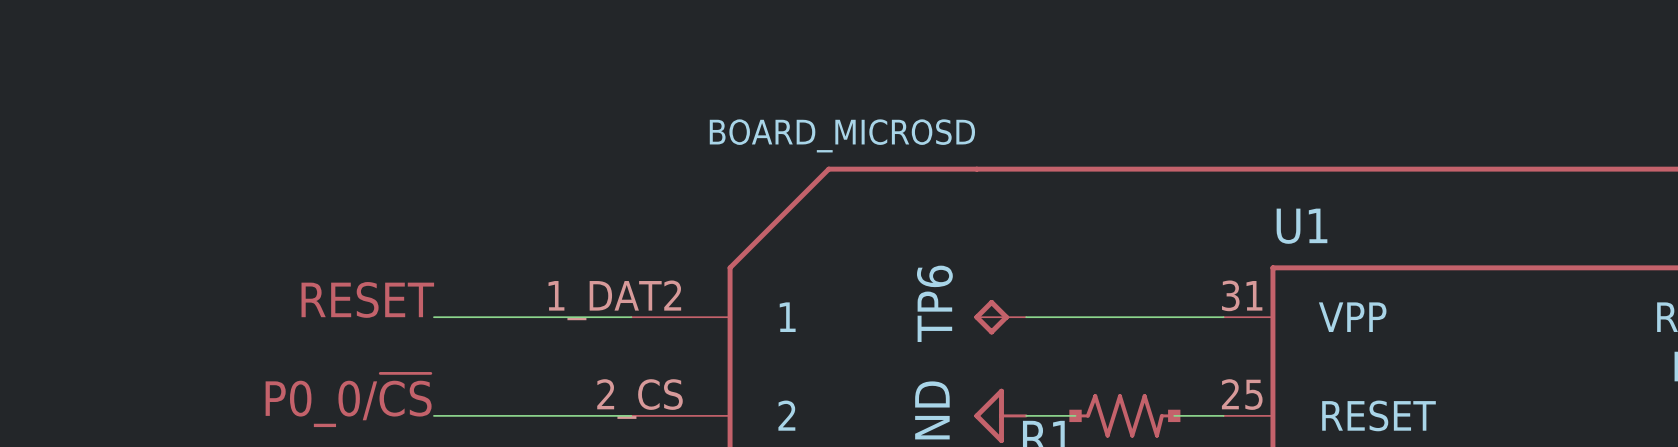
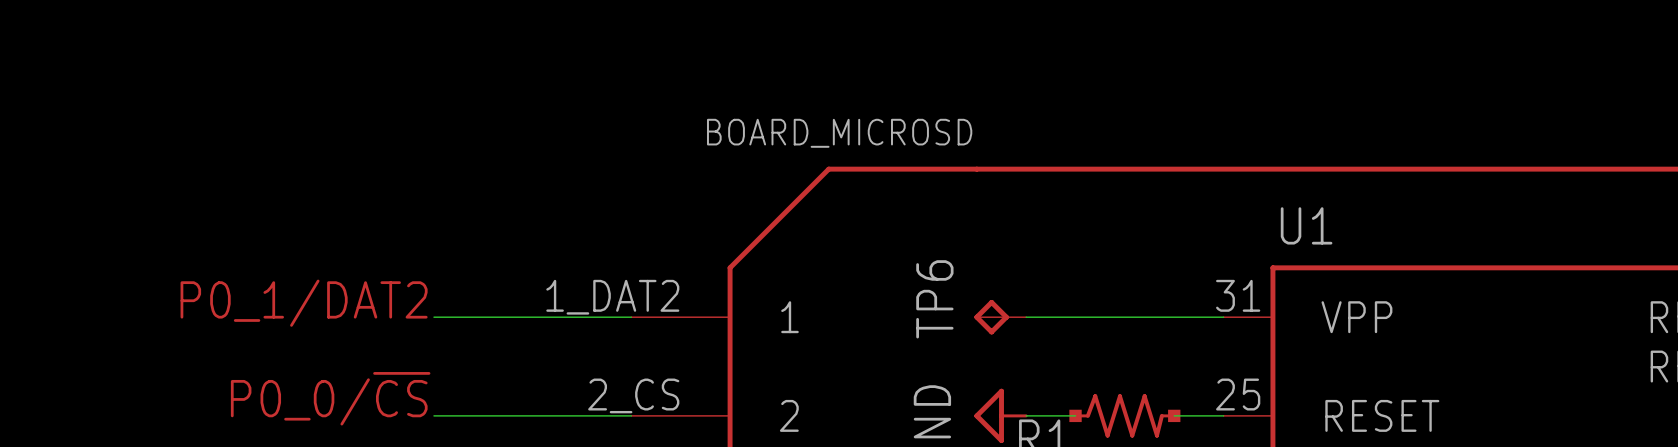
text: RESET (367, 299) -> P0_1/DAT2 (304, 303)

